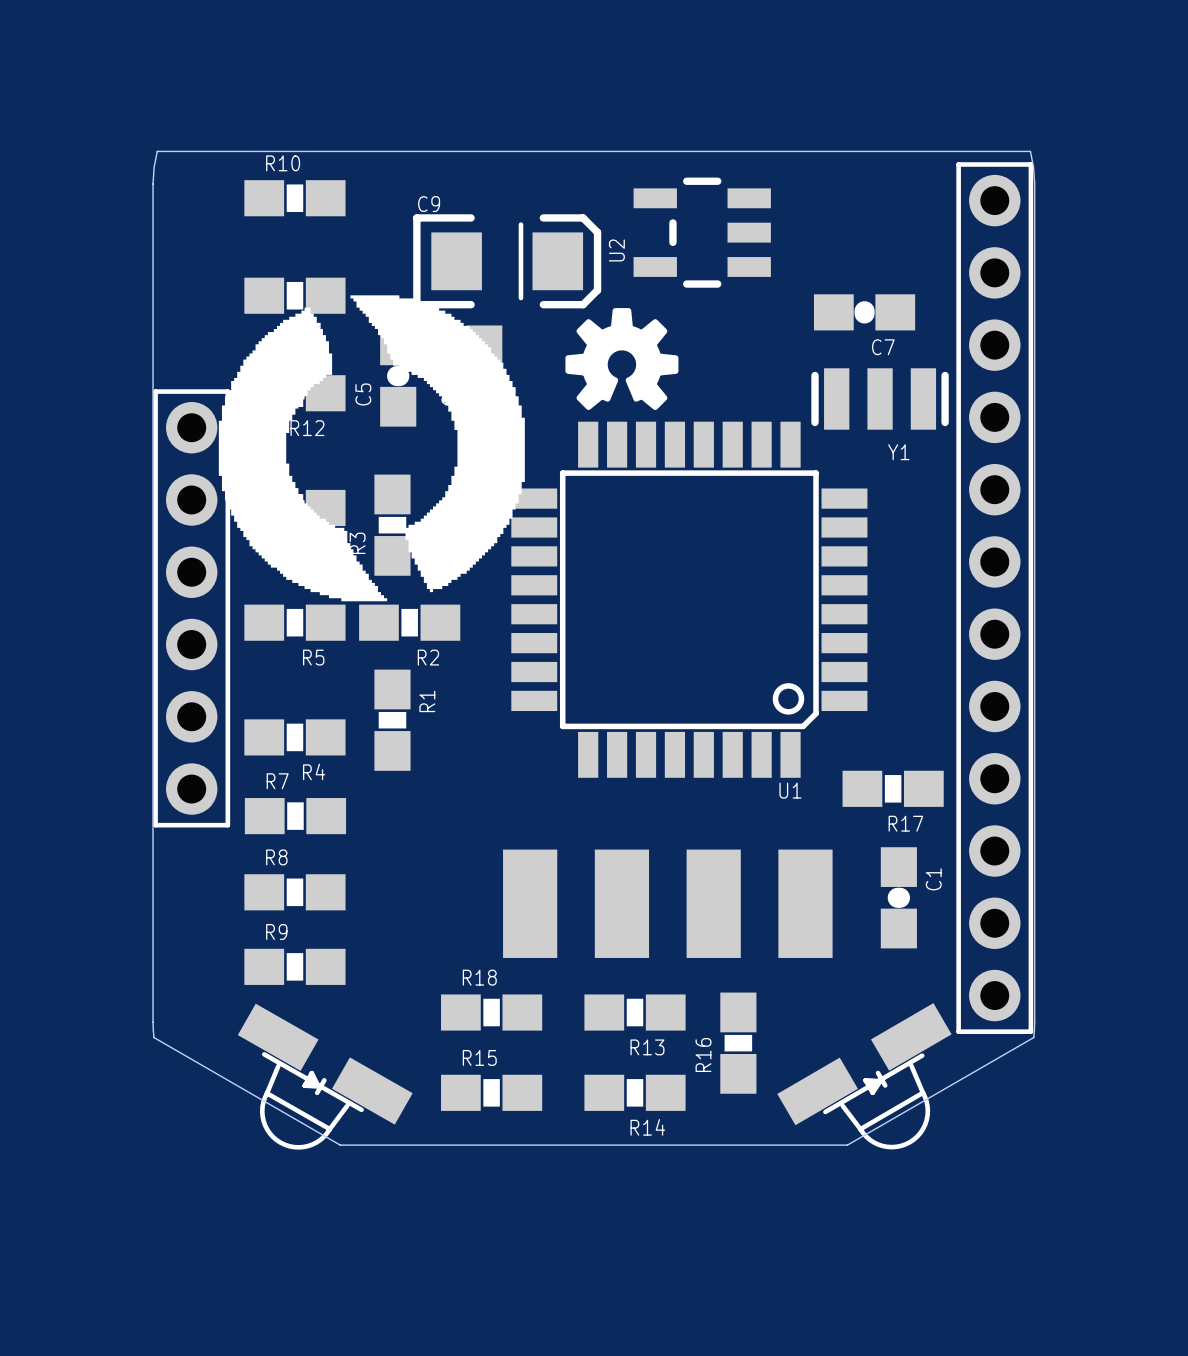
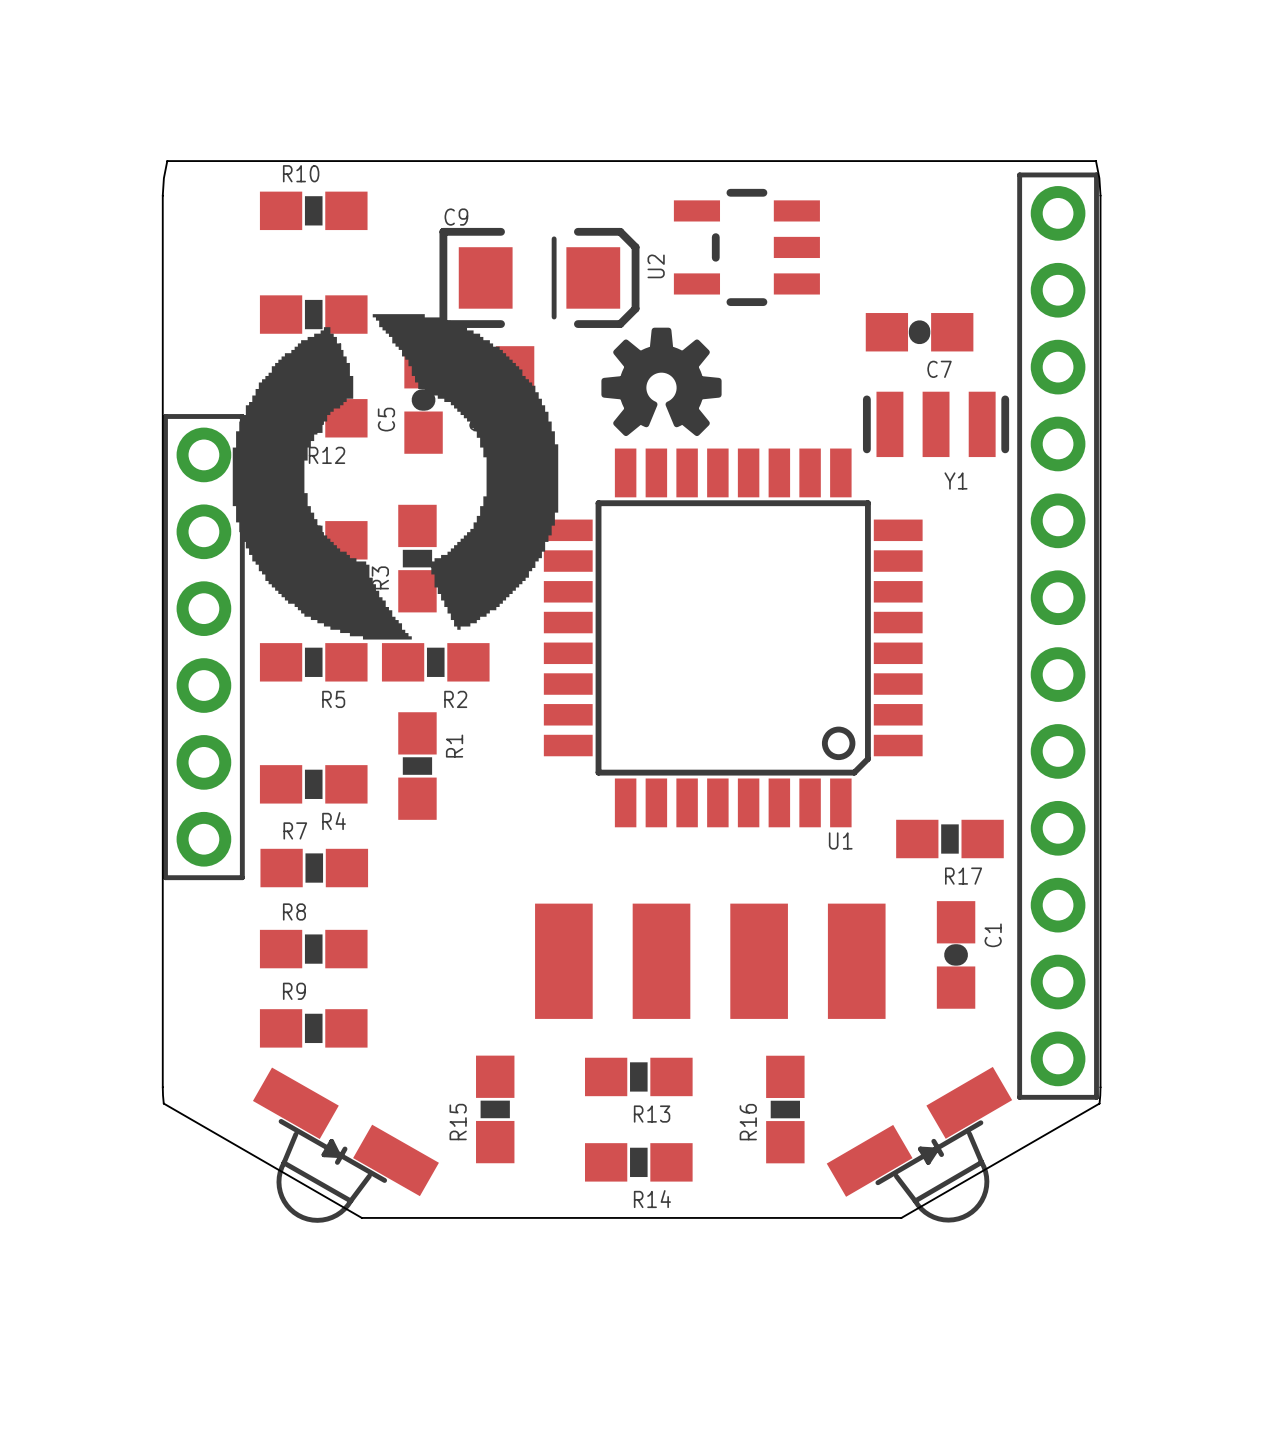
R18: (491, 1012) -> none
R13 position: (635, 1012) -> (638, 1076)
R15 rotation: 0° (491, 1092) -> 90° clockwise (495, 1109)
R14 position: (635, 1092) -> (638, 1162)

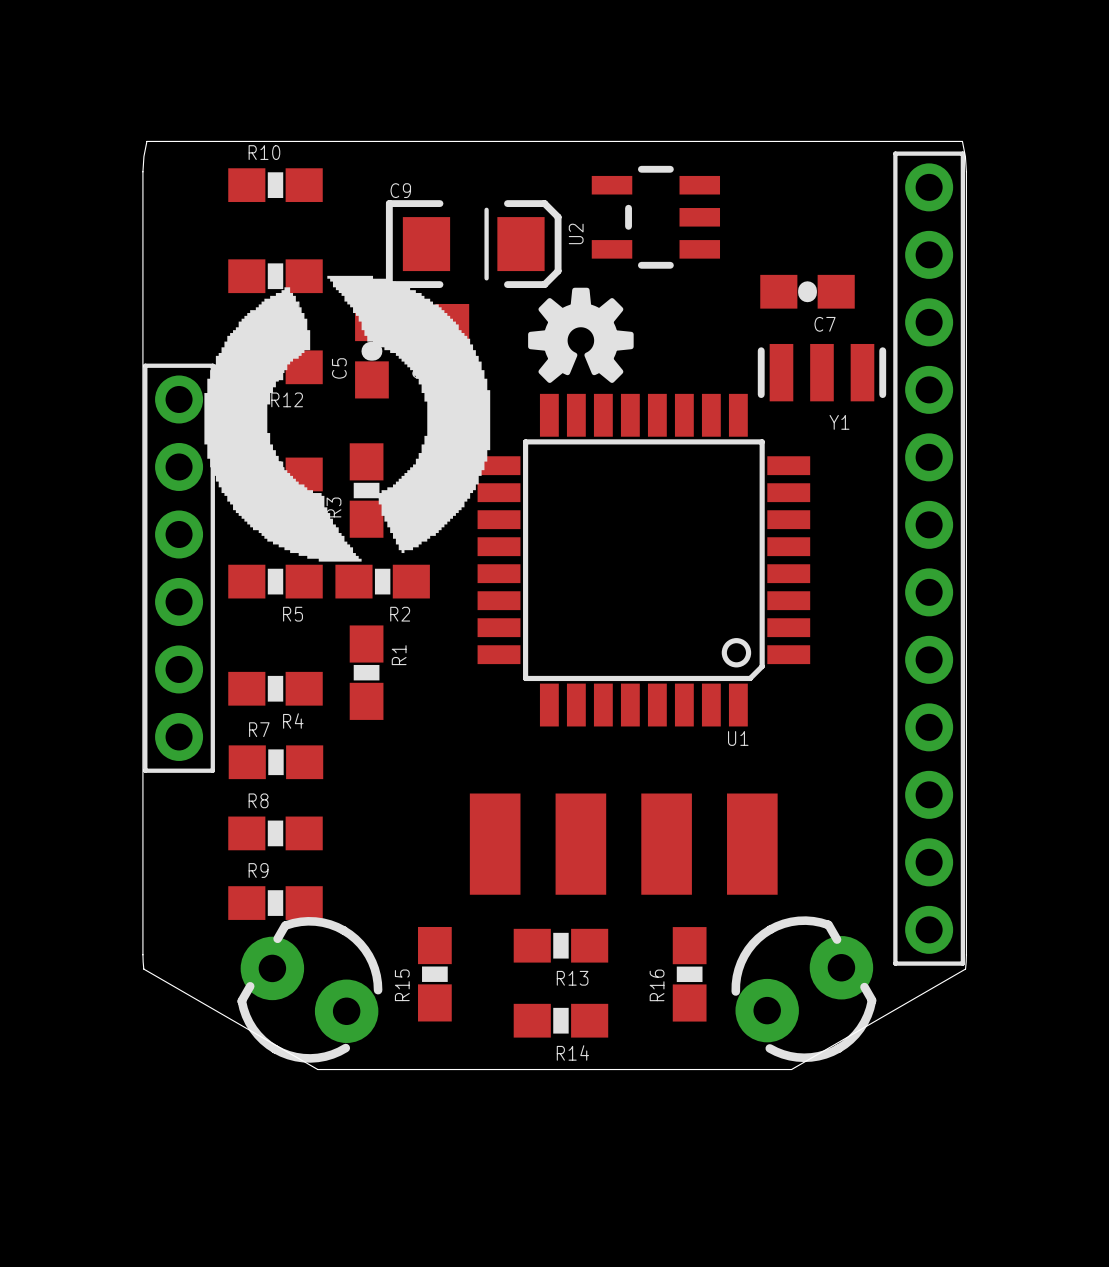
R17: (949, 839) -> none
C1: (956, 954) -> none
part footprint: [826, 1066, 1013, 1223] -> [731, 916, 877, 1063]
part footprint: [252, 1067, 439, 1223] -> [237, 917, 383, 1063]

